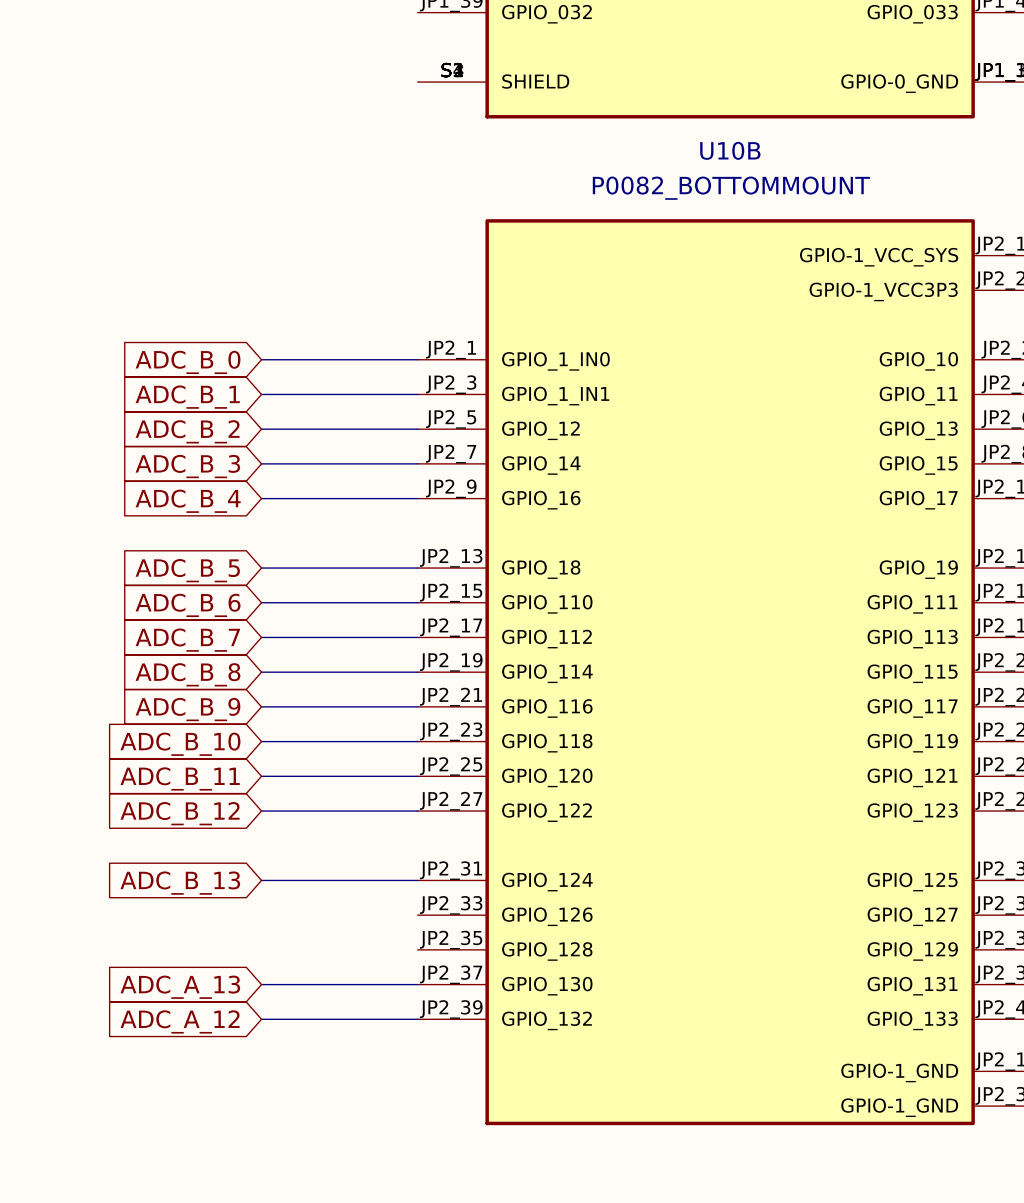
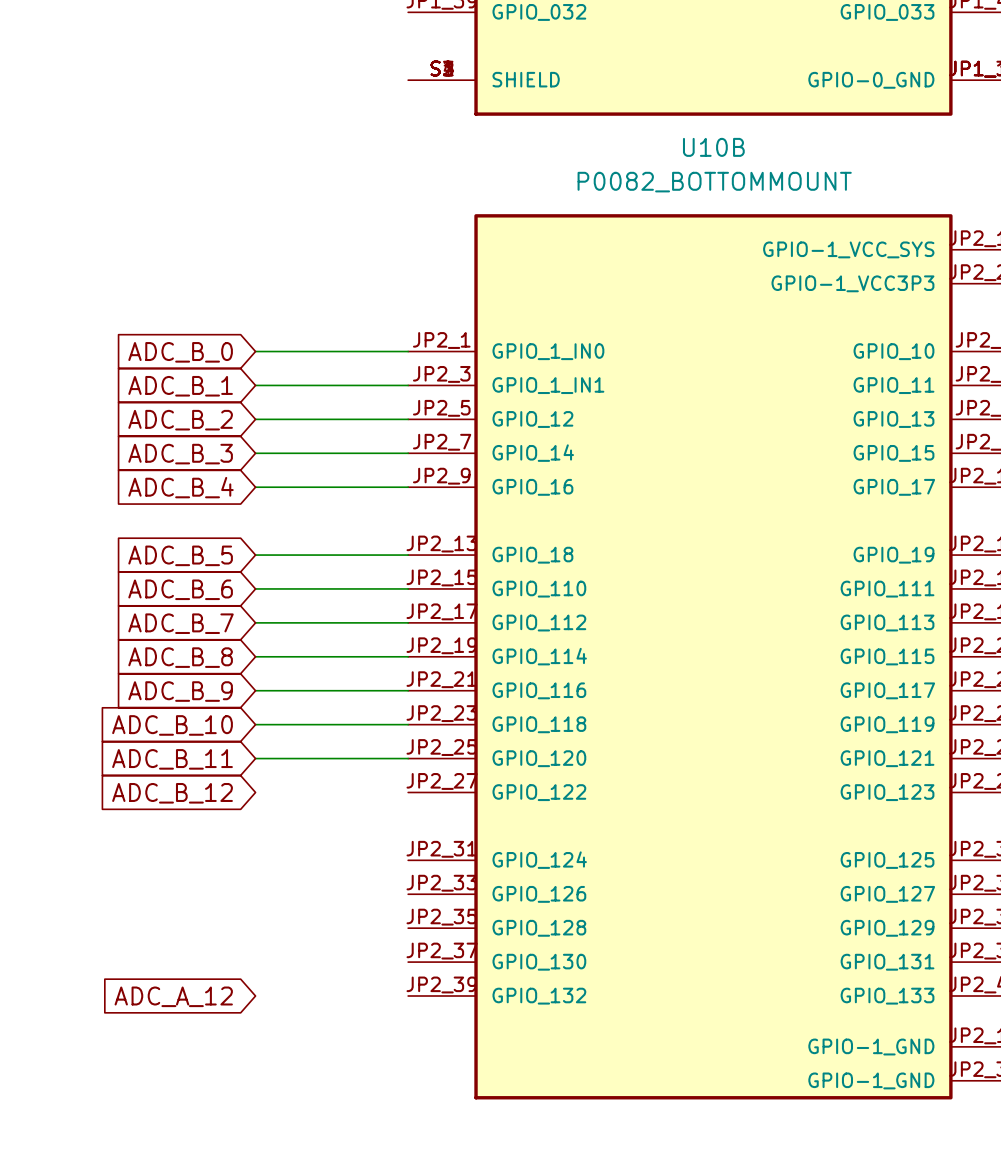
wire: (261, 811) (417, 811) -> none
wire: (261, 880) (417, 880) -> none
global label: ADC_B_13 (180, 883) -> none
wire: (261, 984) (417, 984) -> none
global label: ADC_A_13 (180, 987) -> none
wire: (261, 1019) (417, 1019) -> none

